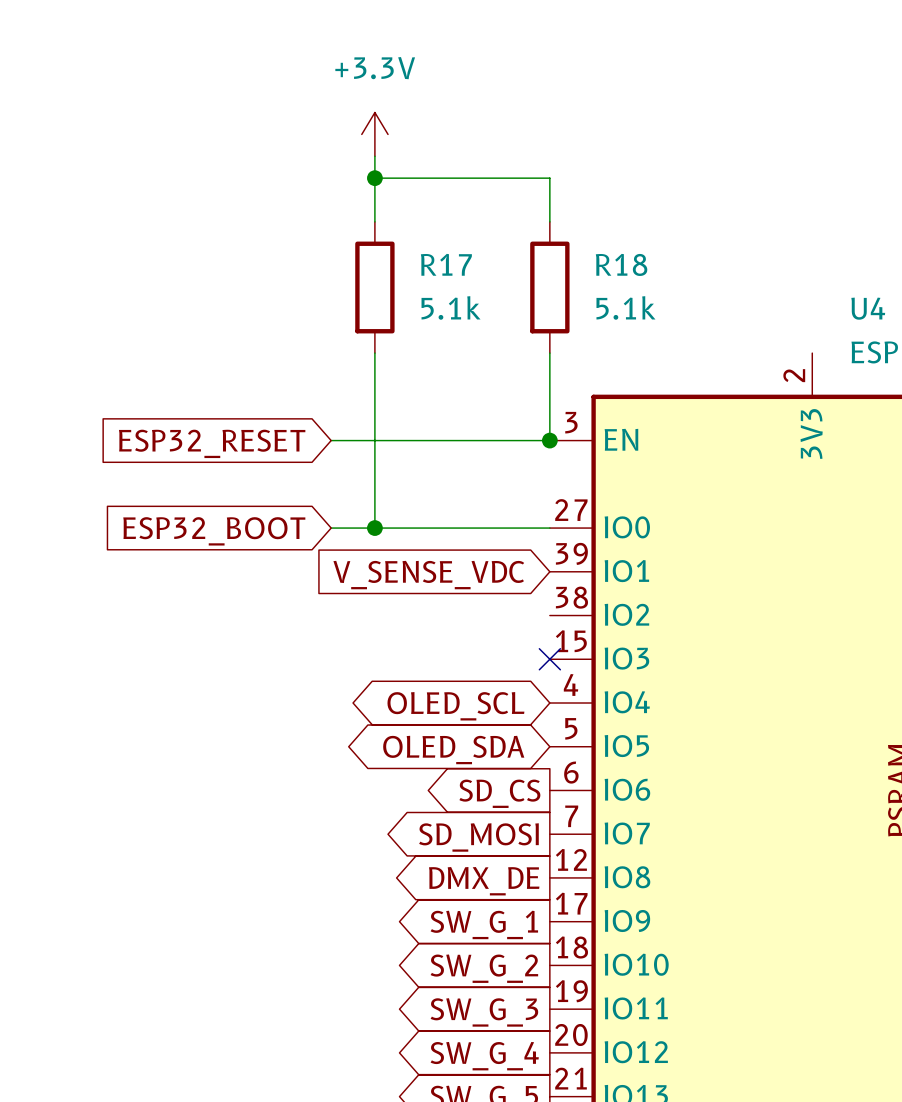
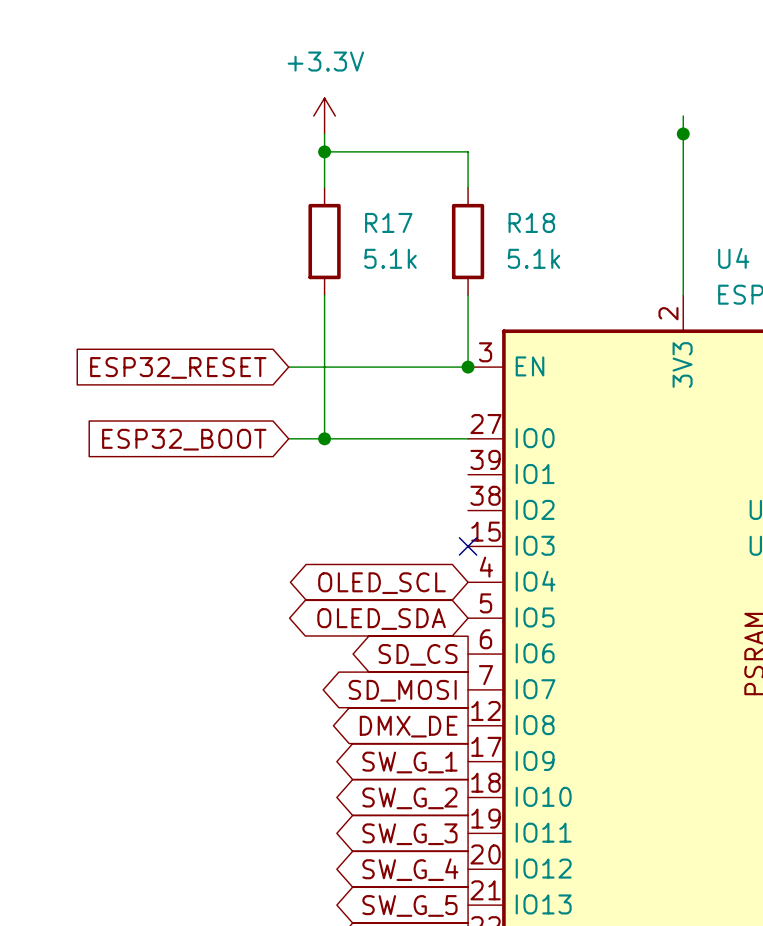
wire: none -> (683, 116) (683, 295)
junction: none -> (683, 133)
global label: V_SENSE_VDC (428, 575) -> none

